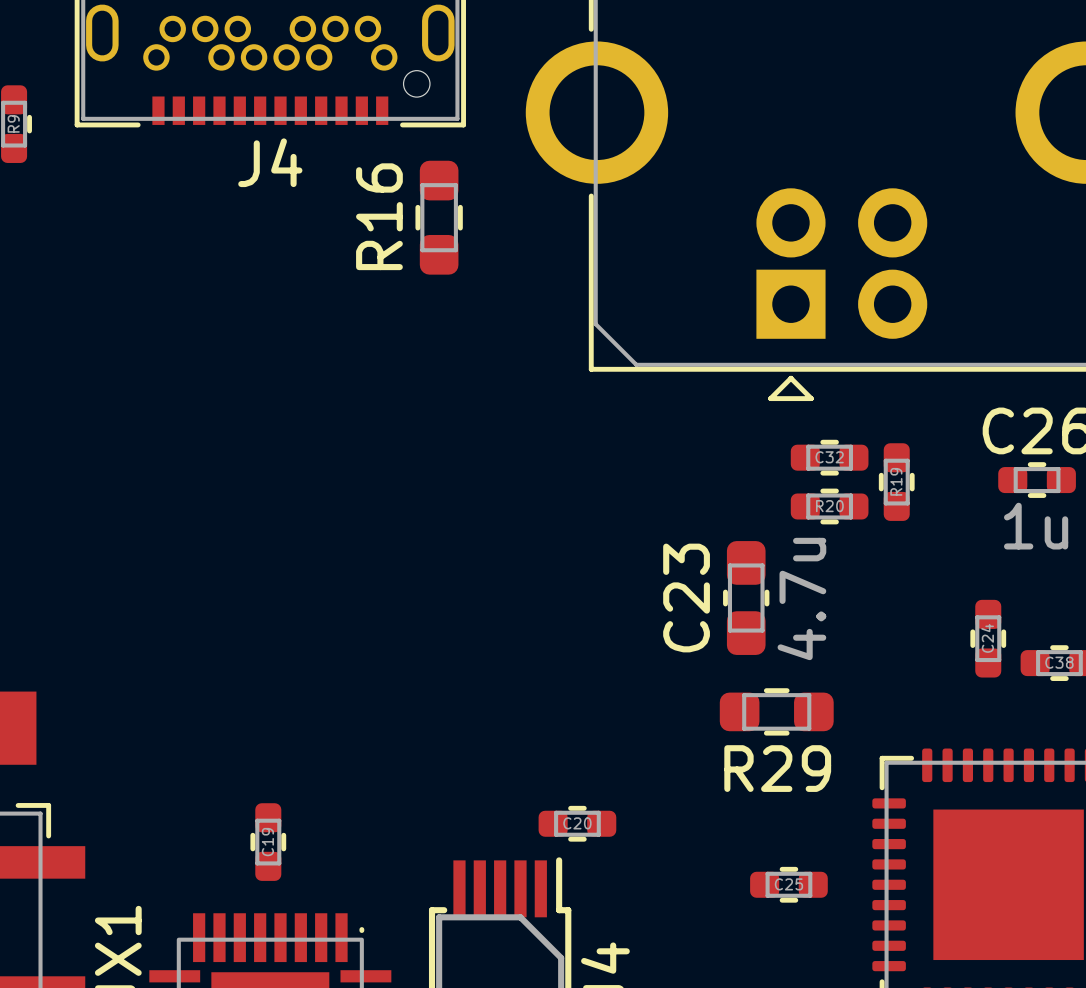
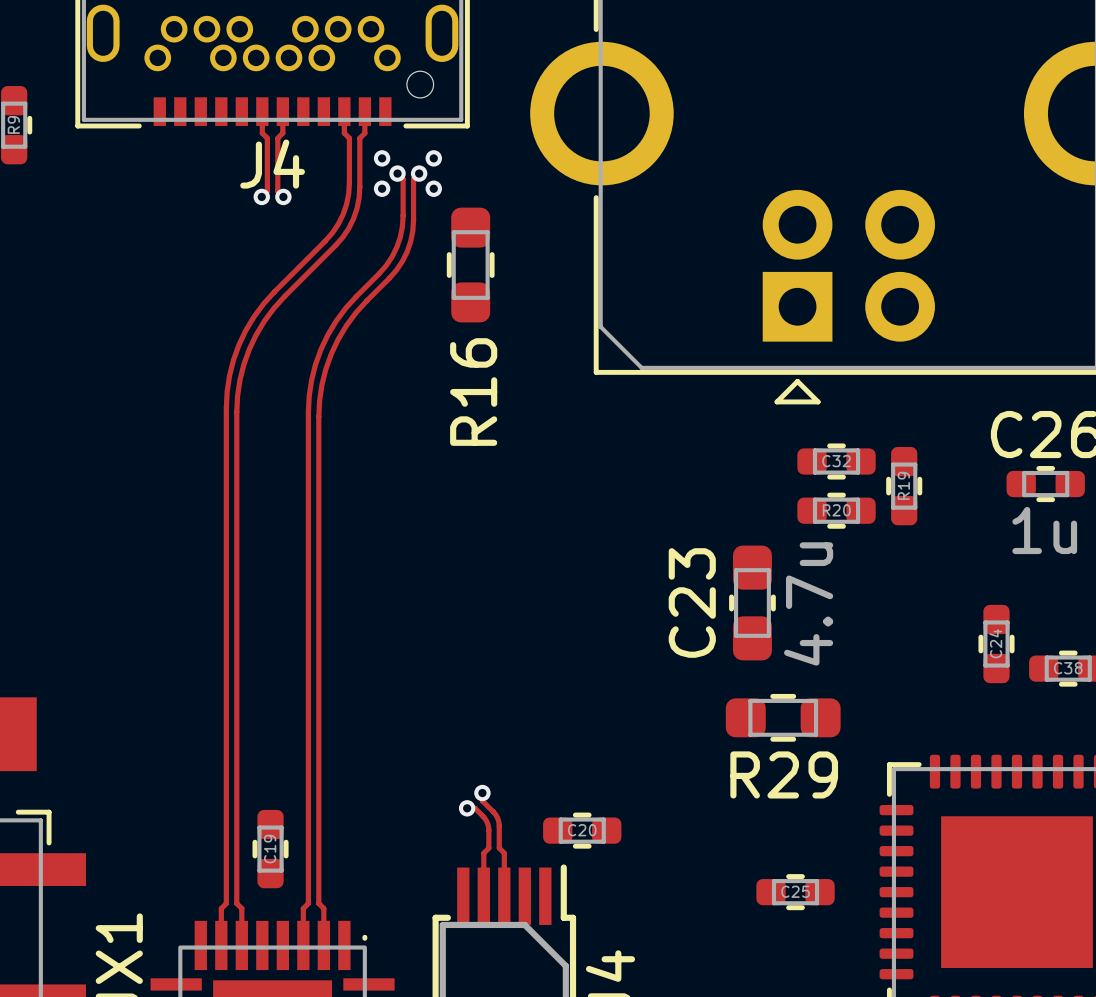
track: none -> (262, 111) (262, 133) (267, 138) (267, 191) (261, 196)
track: none -> (282, 111) (282, 133) (277, 138) (277, 191) (283, 196)
track: none -> (344, 111) (344, 133) (349, 138) (349, 182) (343, 214) (332, 232) (274, 291) (254, 316) (238, 345) (229, 375) (227, 391) (226, 903) (221, 908) (221, 945)
track: none -> (364, 111) (364, 133) (359, 138) (359, 197) (353, 218) (342, 237) (284, 296) (264, 321) (249, 349) (239, 380) (237, 396) (236, 903) (241, 908) (241, 945)
via: none -> (382, 158)
via: none -> (433, 158)
track: none -> (397, 173) (403, 179) (403, 215) (396, 247) (386, 265) (345, 308) (327, 335) (315, 364) (309, 396) (308, 903) (303, 908) (303, 945)
via: none -> (397, 173)
track: none -> (419, 173) (413, 179) (412, 230) (407, 251) (396, 270) (356, 312) (338, 339) (325, 369) (319, 400) (318, 903) (323, 908) (323, 945)
via: none -> (419, 173)
via: none -> (382, 188)
via: none -> (433, 188)
via: none -> (261, 196)
via: none -> (283, 196)
R16 name position: R16 (379, 216) -> R16 (473, 392)
R16 position: (439, 217) -> (470, 265)
track: none -> (482, 793) (482, 800) (494, 813) (498, 822) (499, 848) (504, 853) (504, 896)
via: none -> (482, 793)
track: none -> (467, 808) (475, 808) (485, 819) (488, 826) (488, 848) (483, 853) (483, 896)
via: none -> (467, 808)

